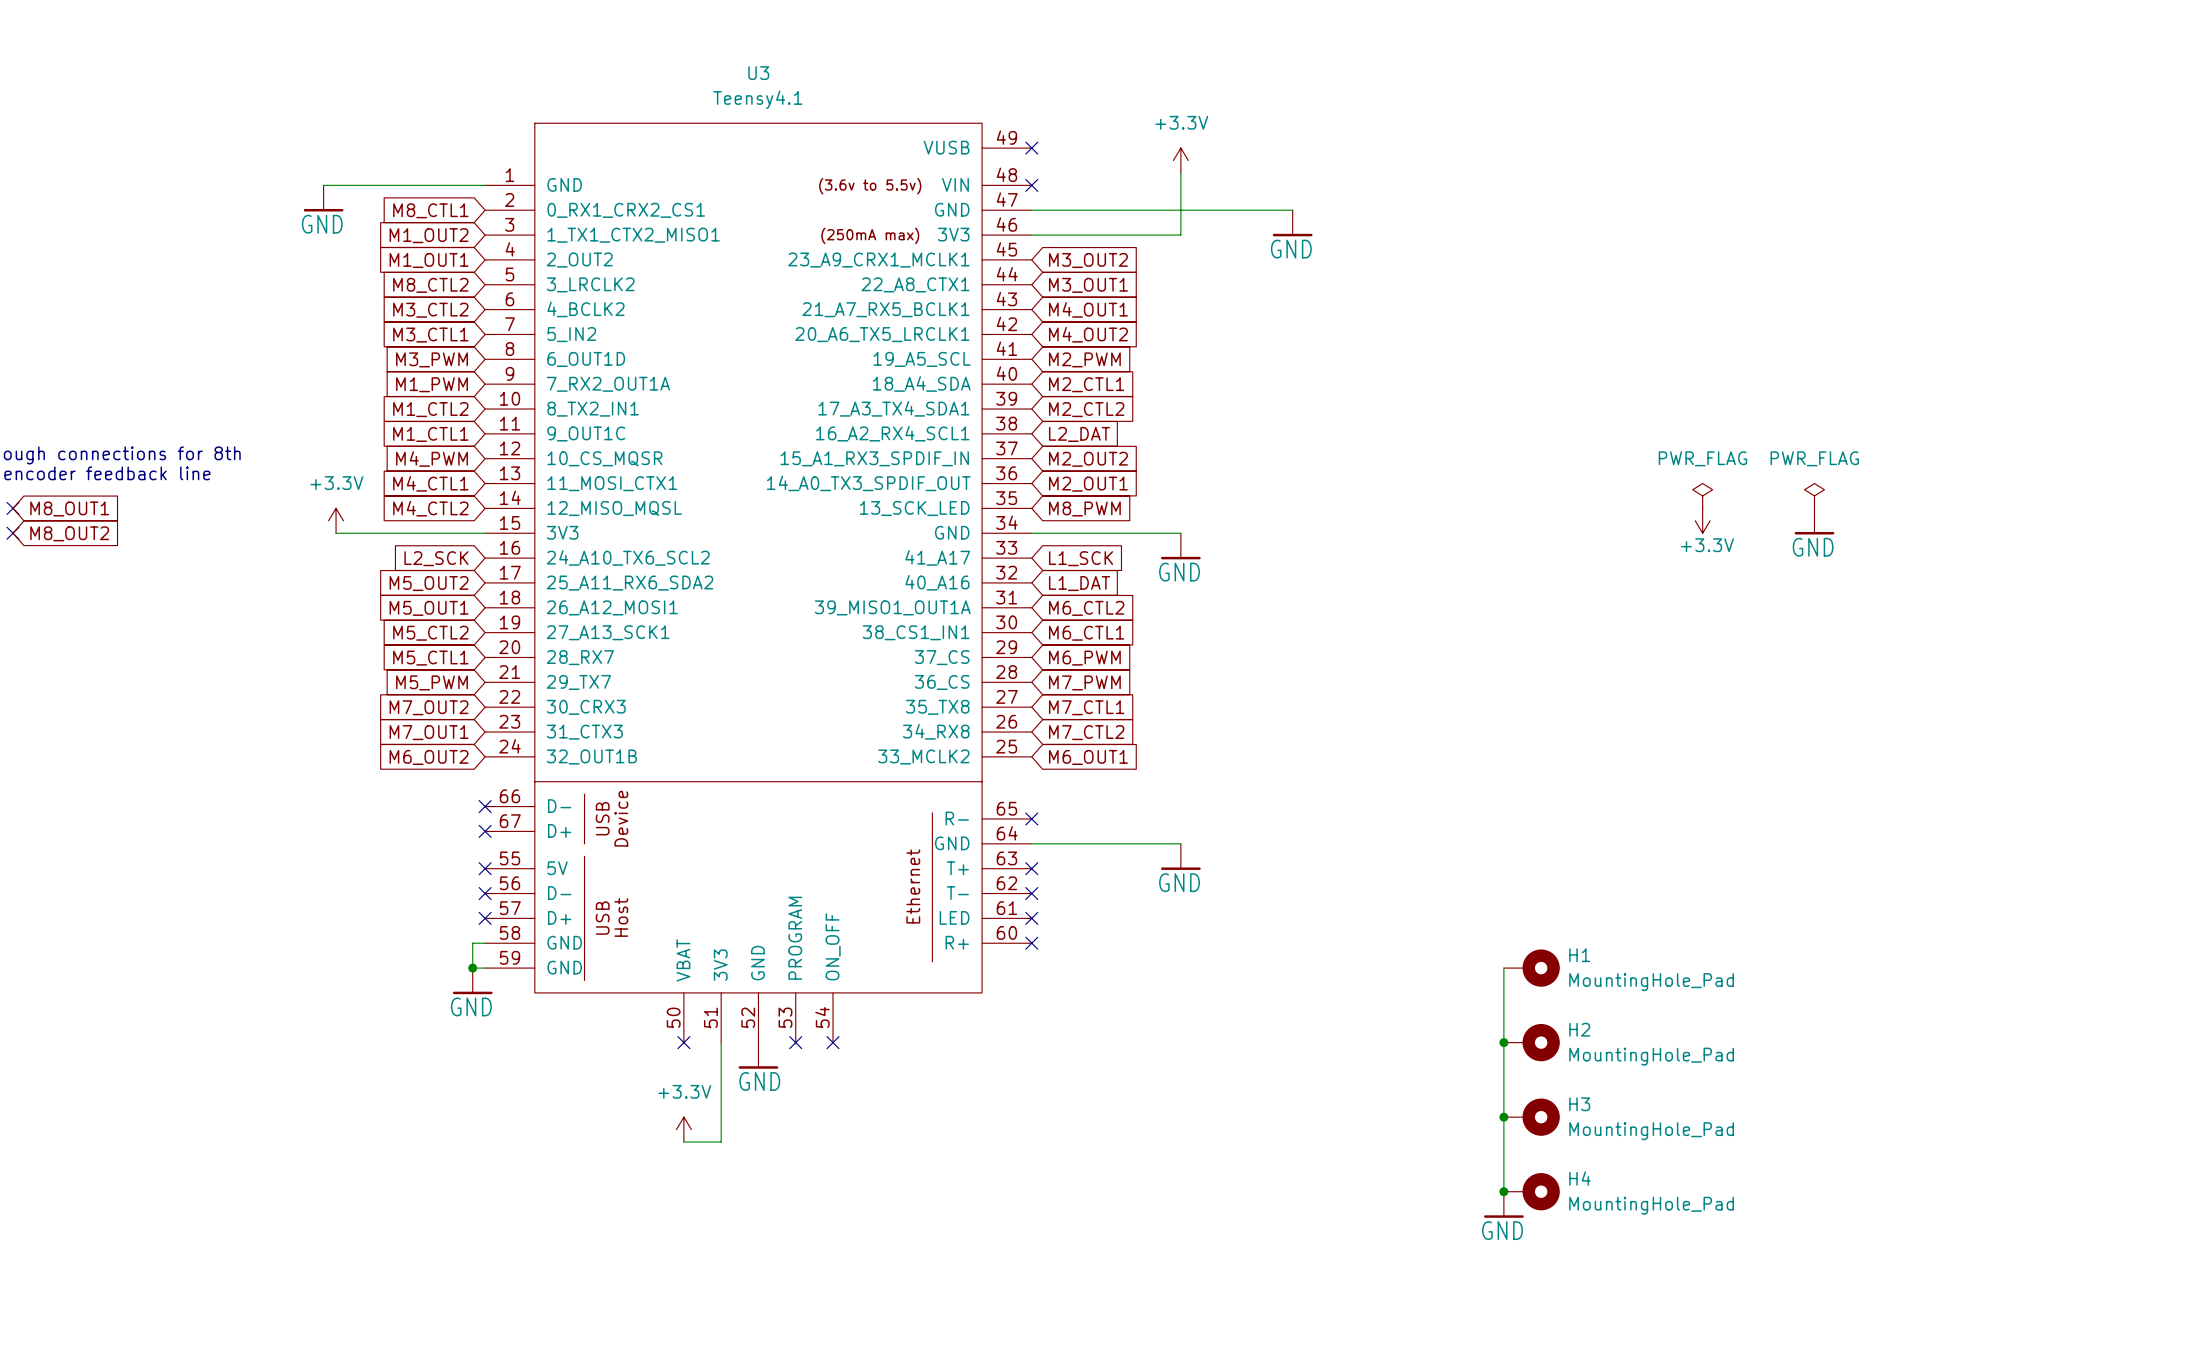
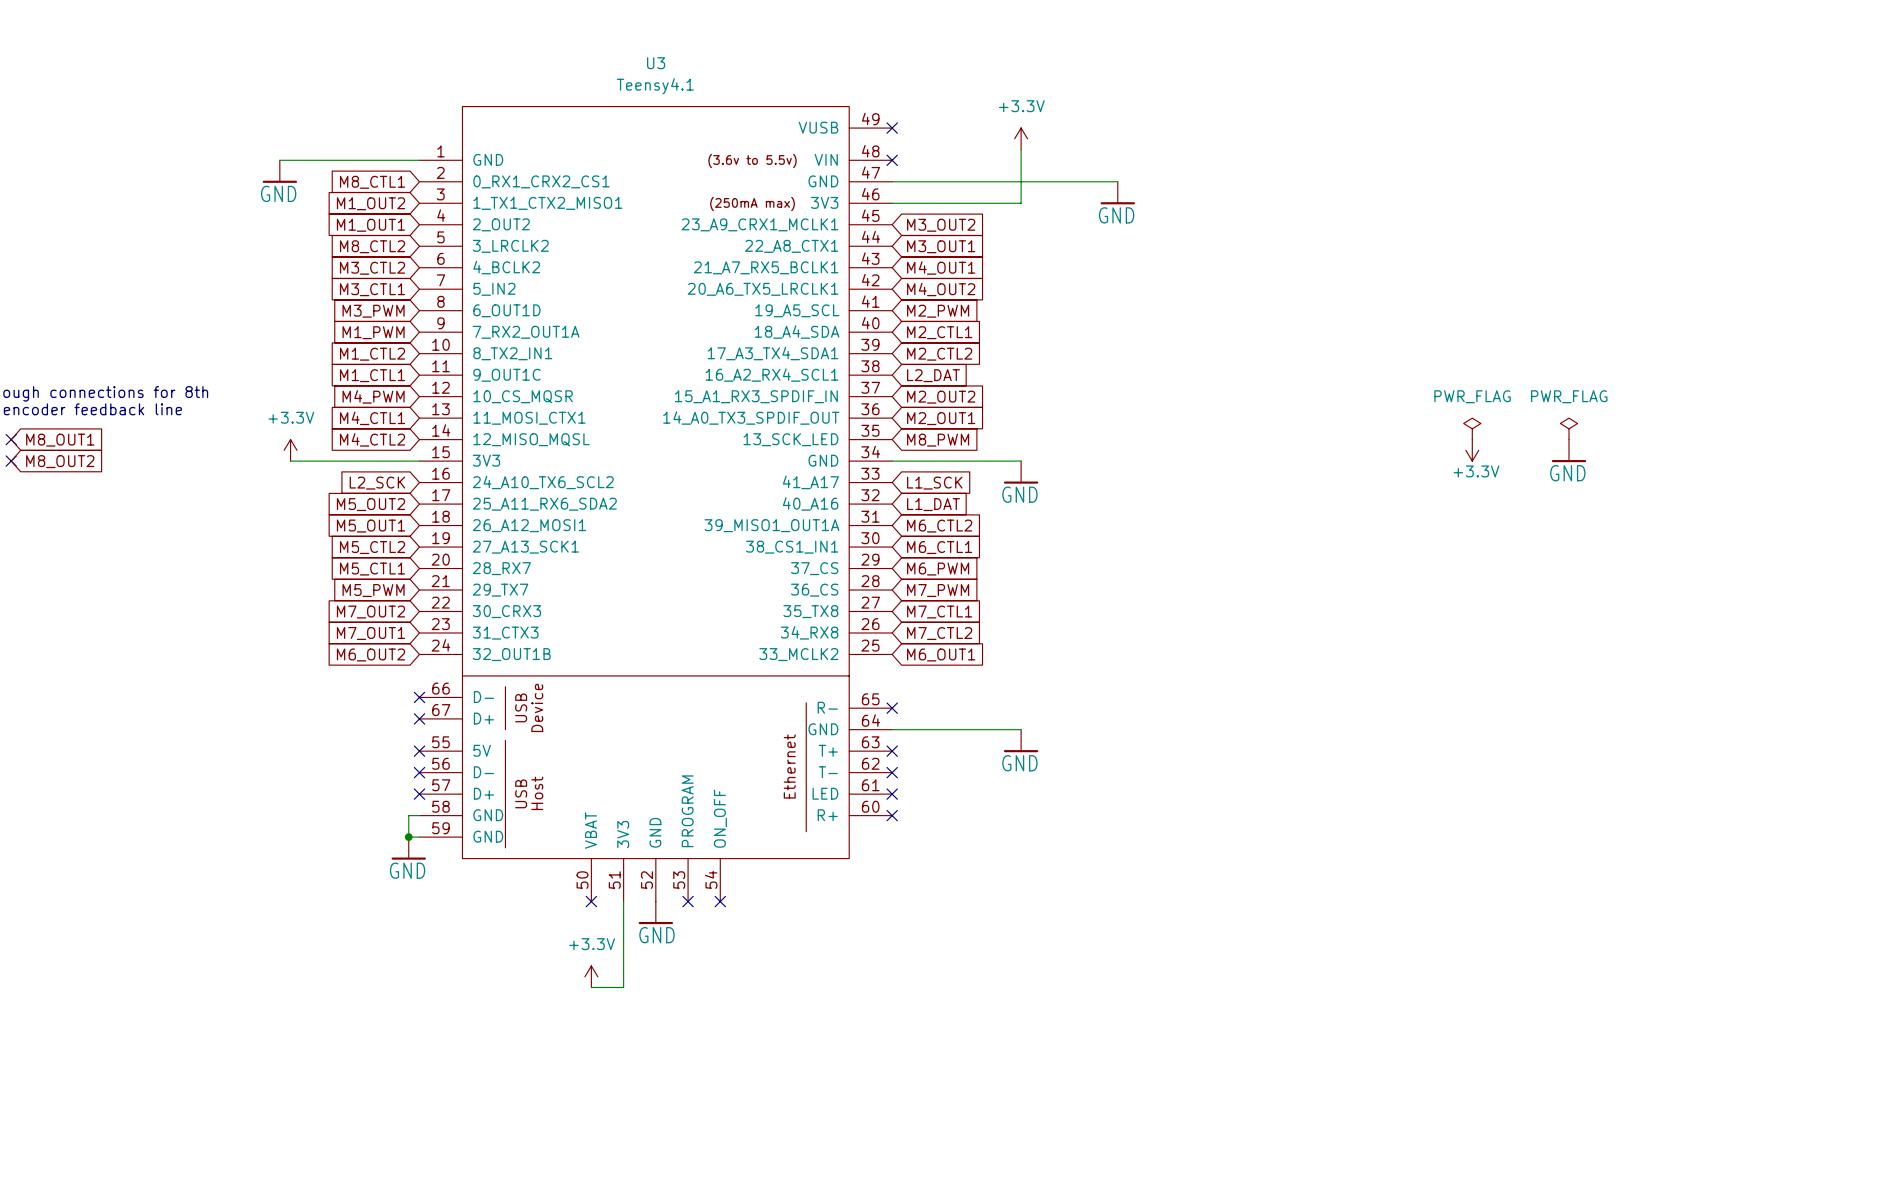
wire: (1503, 968) (1503, 1191) -> none
H1: MountingHole_Pad (1531, 968) -> none
junction: (1503, 1042) -> none
H2: MountingHole_Pad (1531, 1042) -> none
junction: (1503, 1117) -> none
H3: MountingHole_Pad (1531, 1117) -> none
junction: (1503, 1191) -> none
H4: MountingHole_Pad (1531, 1191) -> none
power symbol: GND (1503, 1204) -> none

